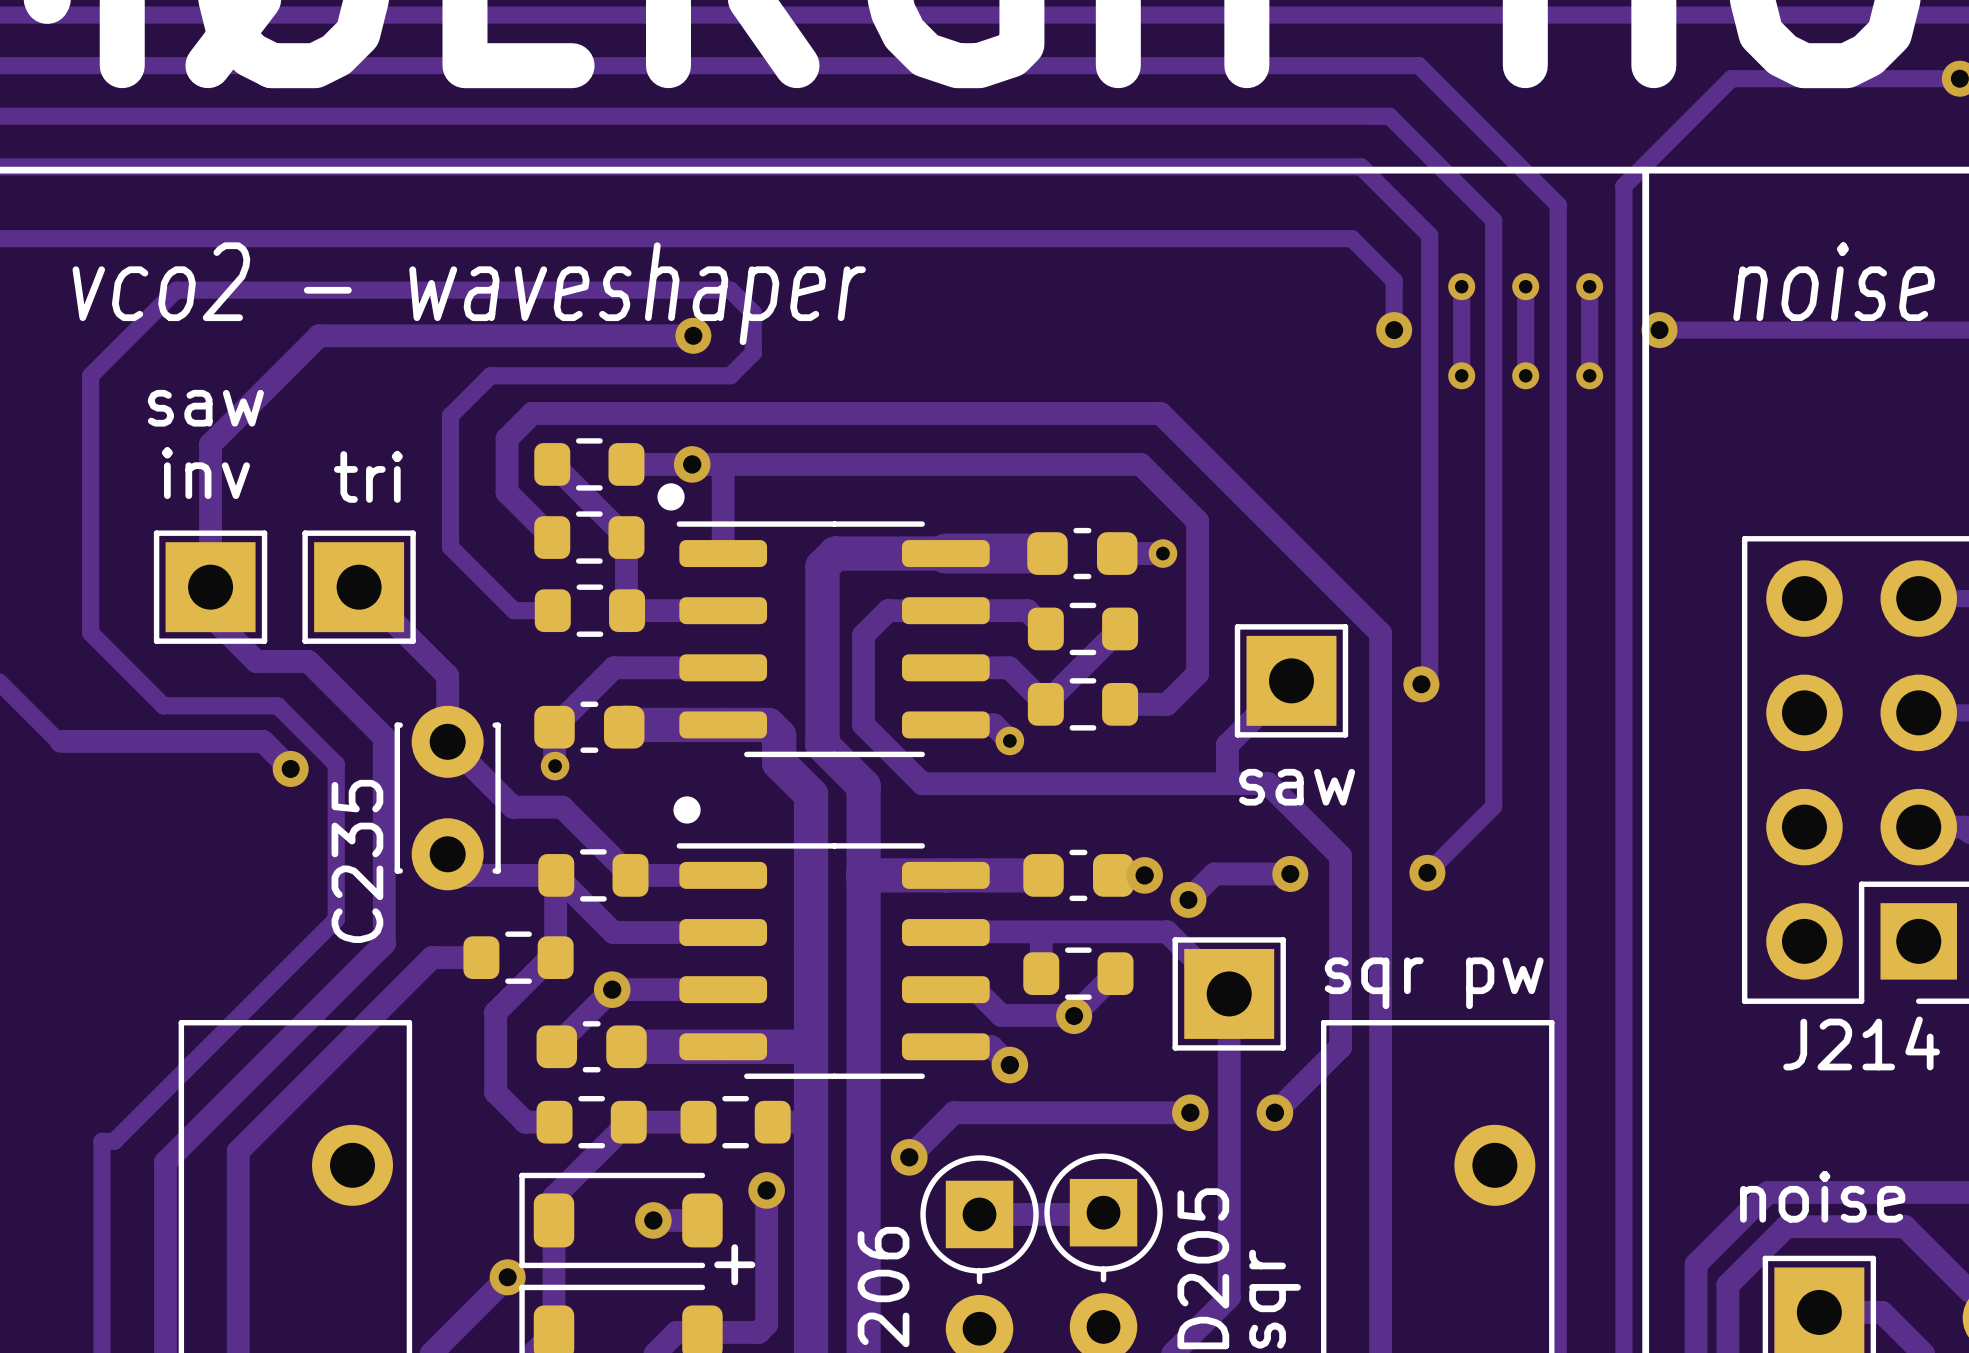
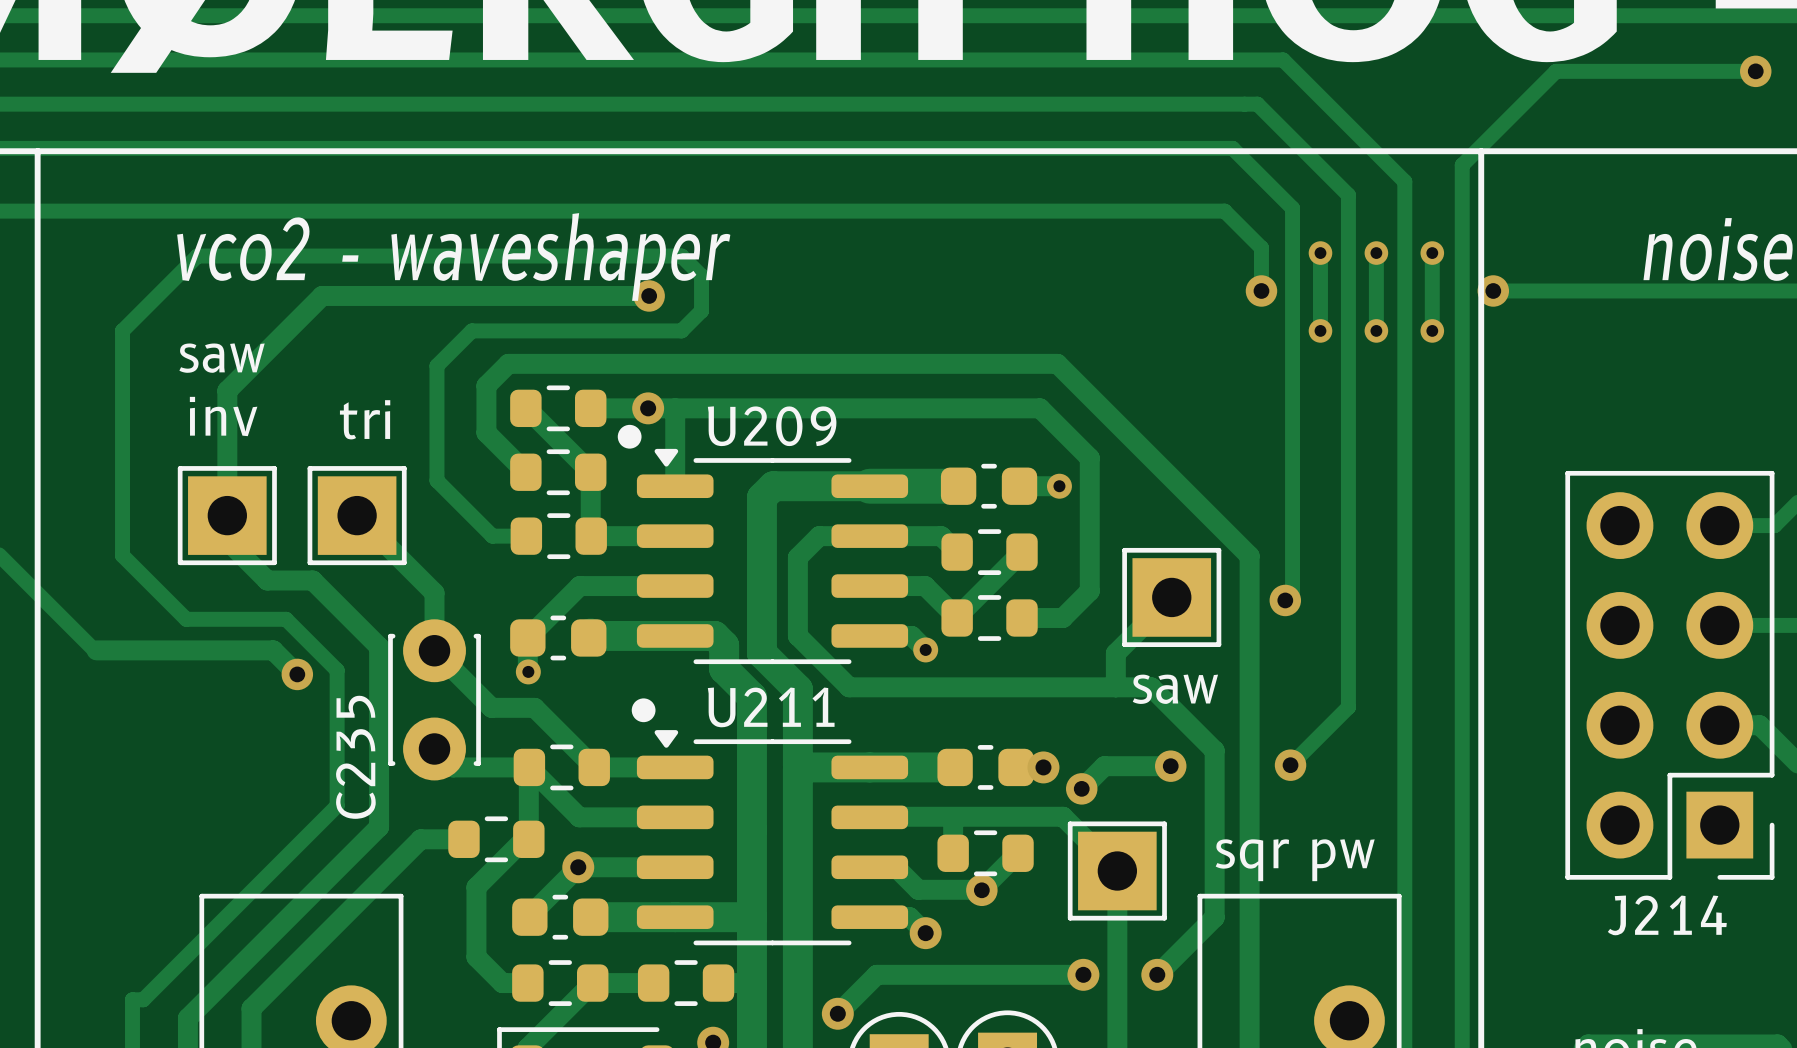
U209: none -> (772, 556)
part: (833, 639) -> none
U211: none -> (772, 837)
part: (833, 961) -> none

